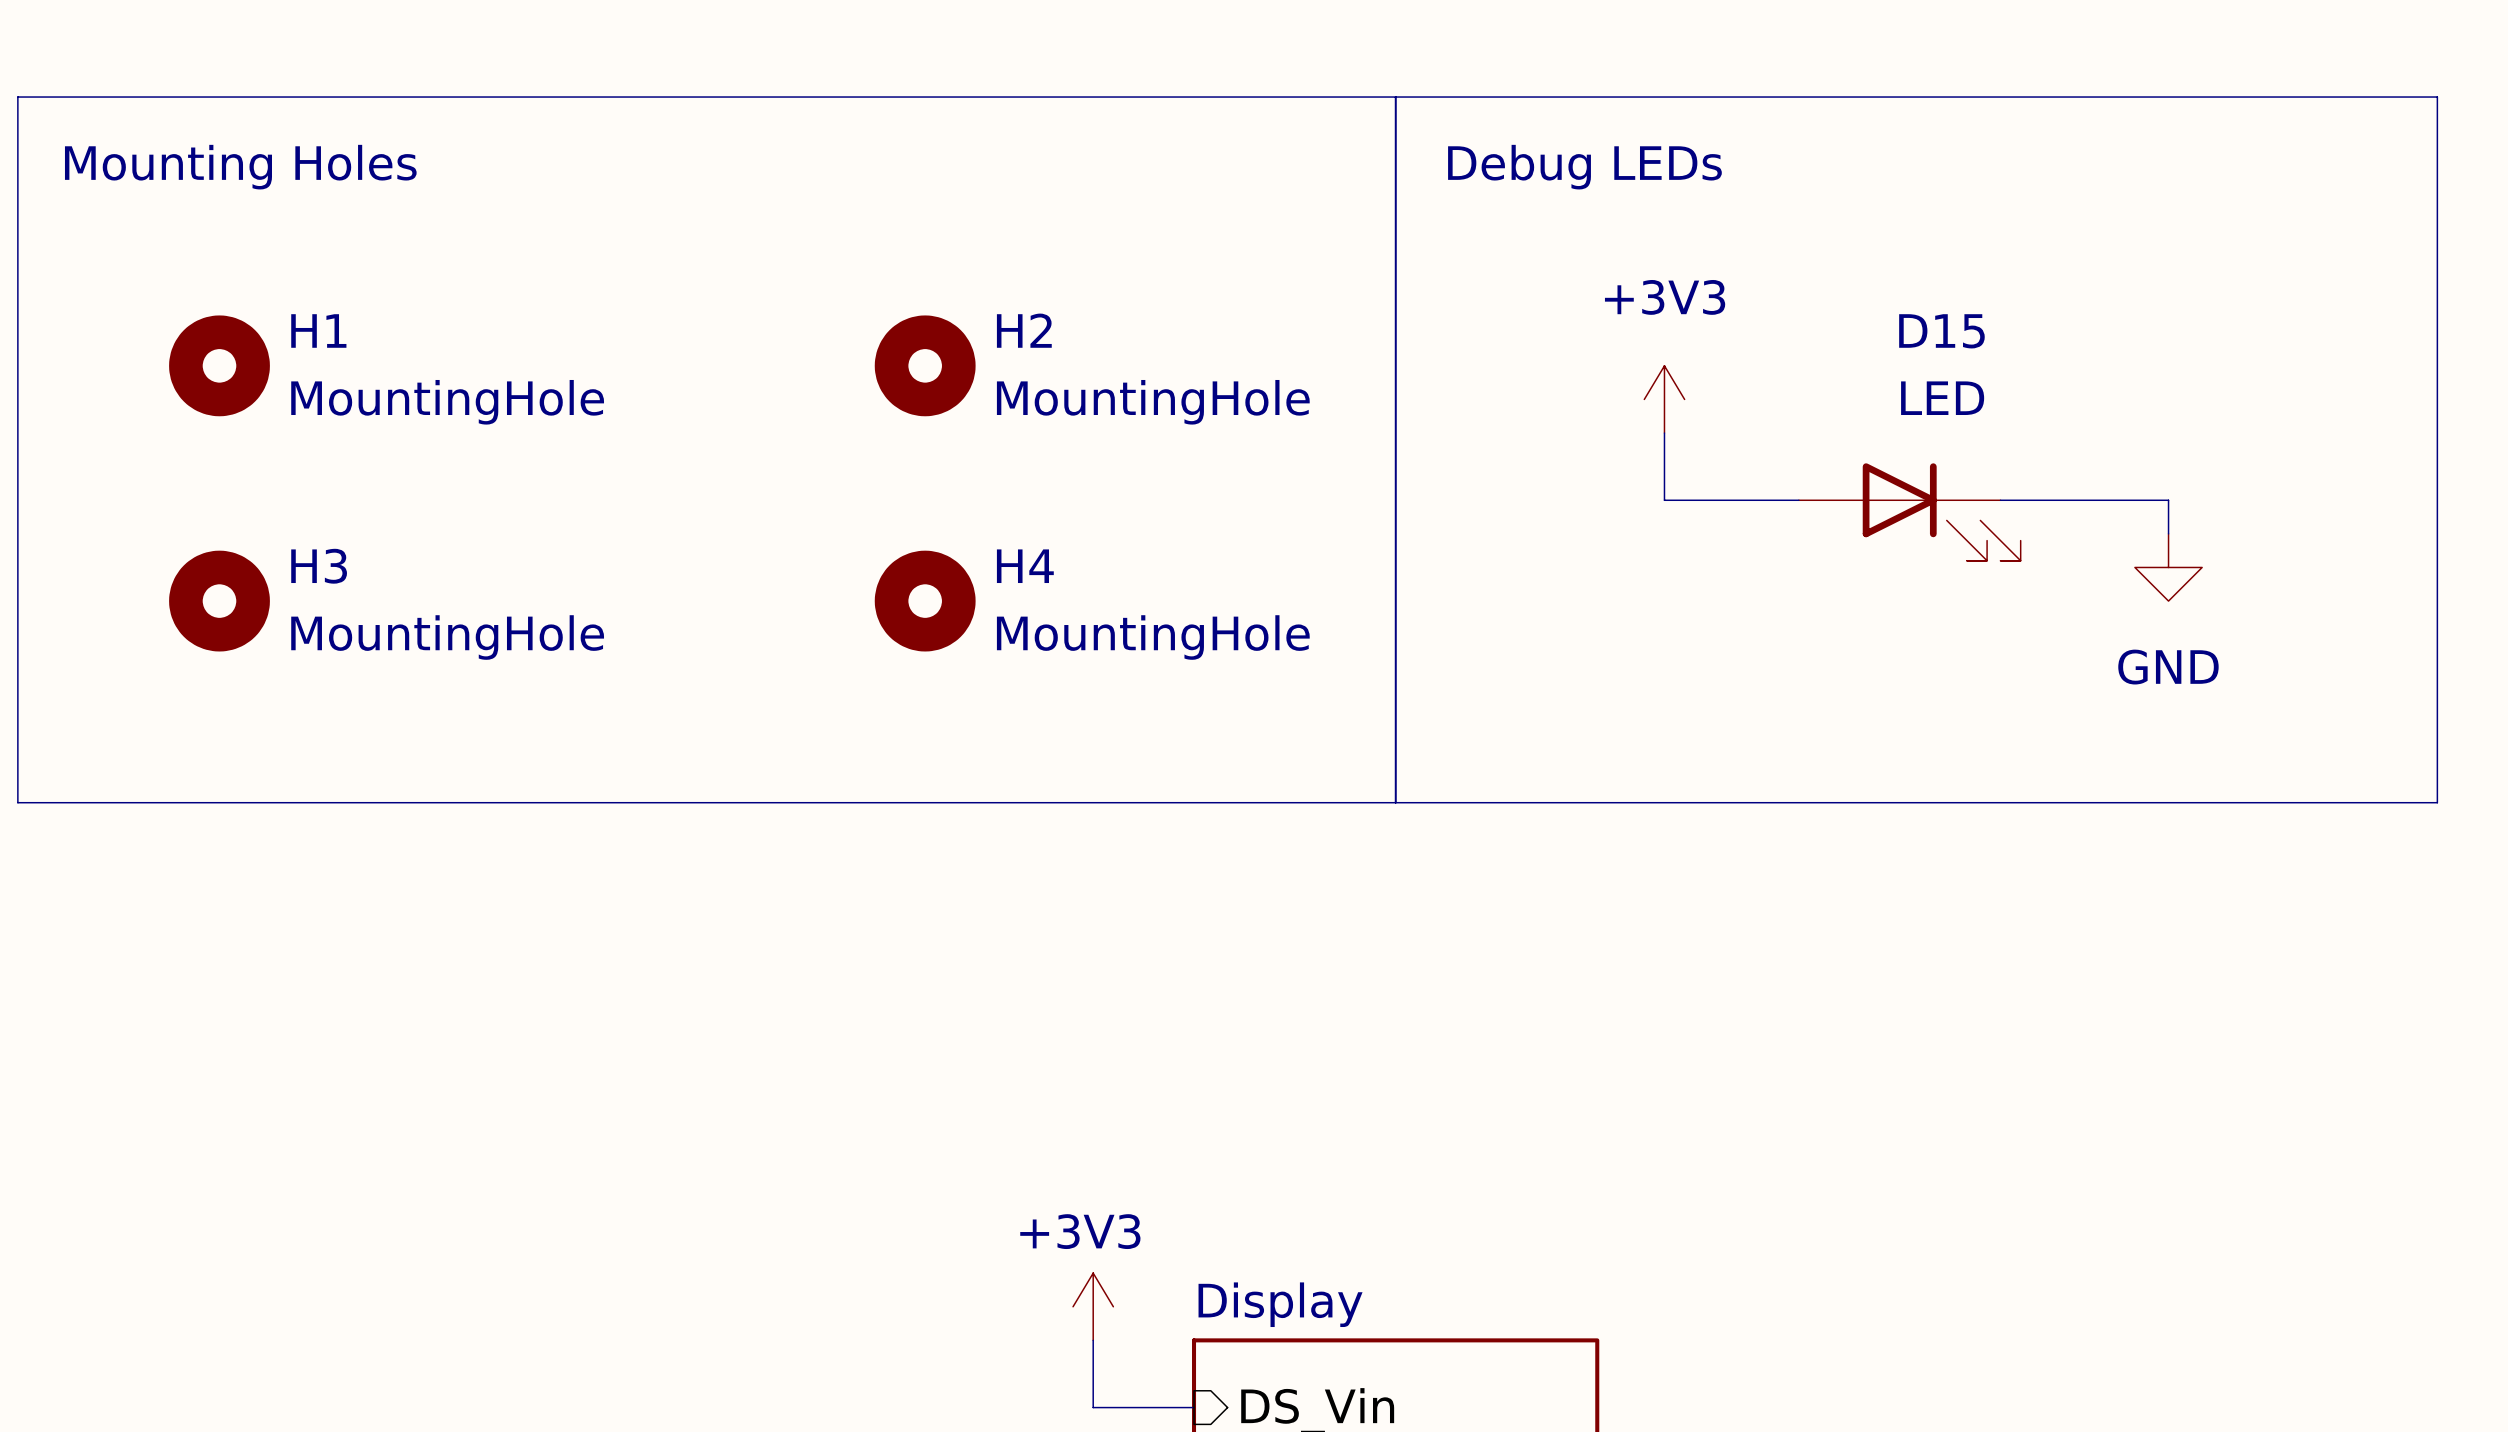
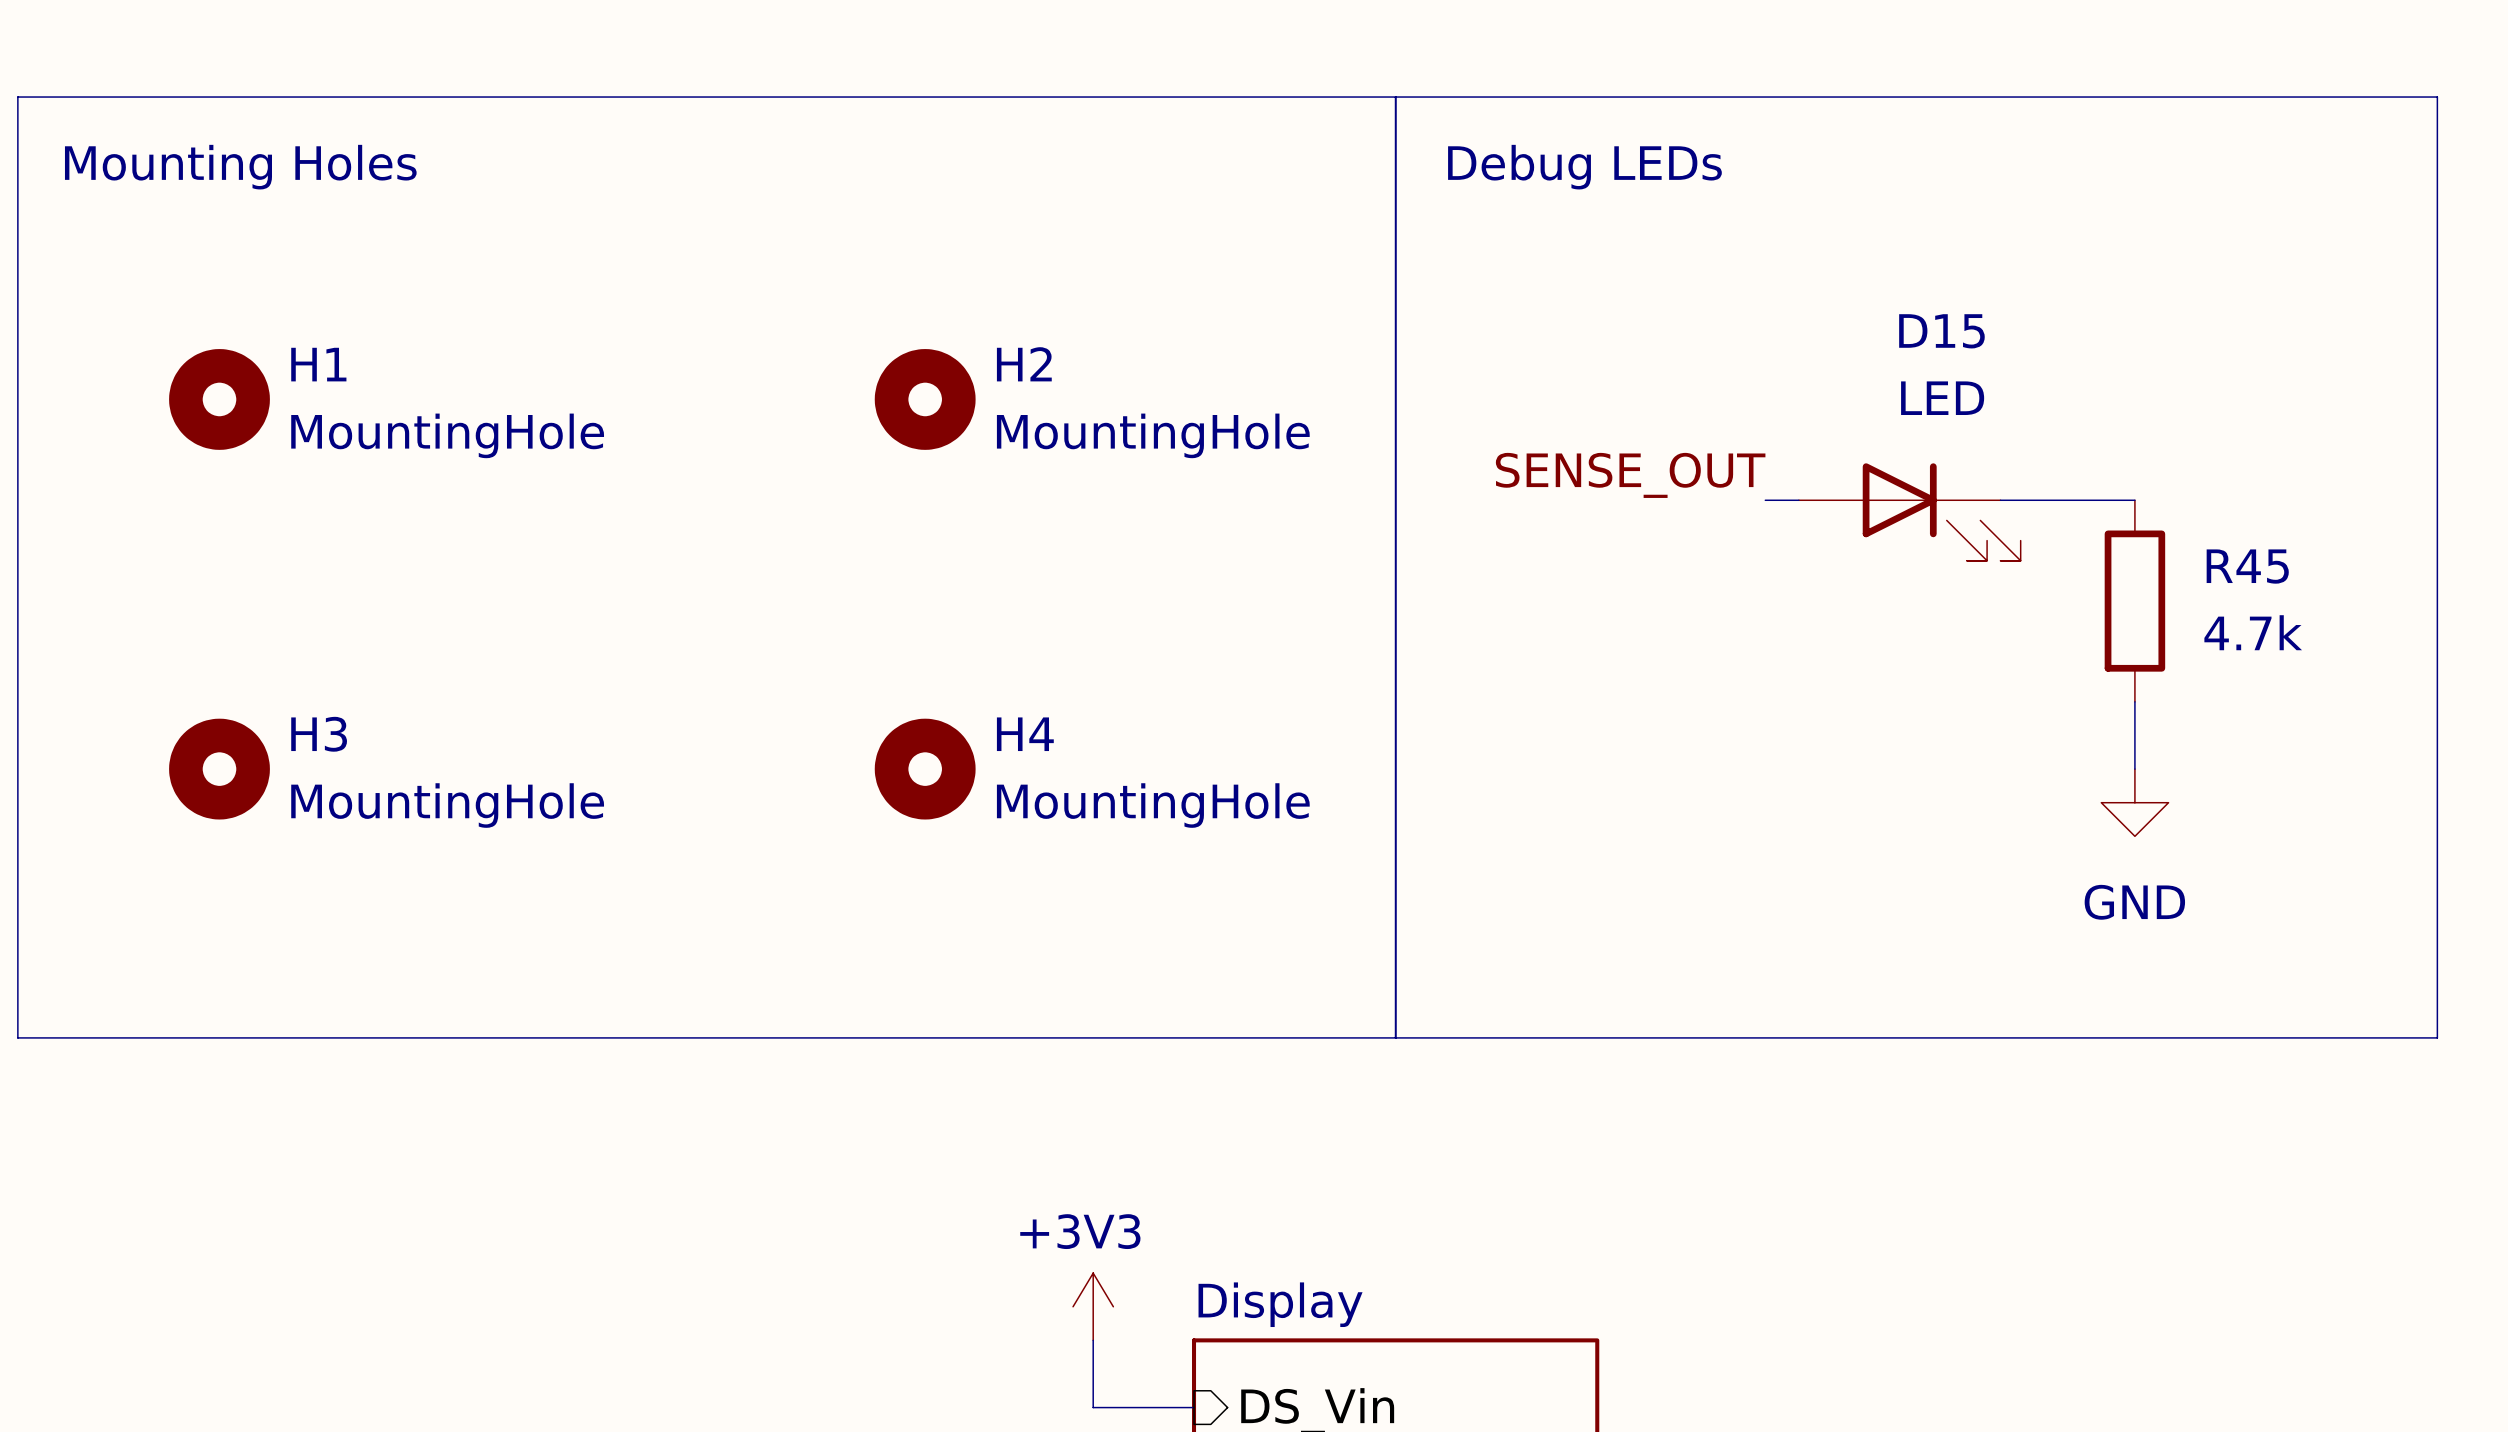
H1 position: (219, 365) -> (219, 399)
H2 position: (925, 365) -> (925, 399)
power symbol: +3V3 (1664, 399) -> none
wire: (1664, 433) (1664, 500) (1765, 500) -> none
label: none -> SENSE_OUT (1630, 475)
wire: (2134, 500) (2168, 500) (2168, 533) -> none
power symbol position: GND (2168, 567) -> GND (2134, 802)
H3 position: (219, 601) -> (219, 769)
H4 position: (925, 601) -> (925, 769)
R45: none -> 4.7k (2134, 601)
wire: none -> (2134, 701) (2134, 769)
line: (17, 802) (2437, 802) -> (17, 802) (17, 1037) (2437, 1037) (2437, 802)
line: none -> (1395, 802) (1395, 1037)

